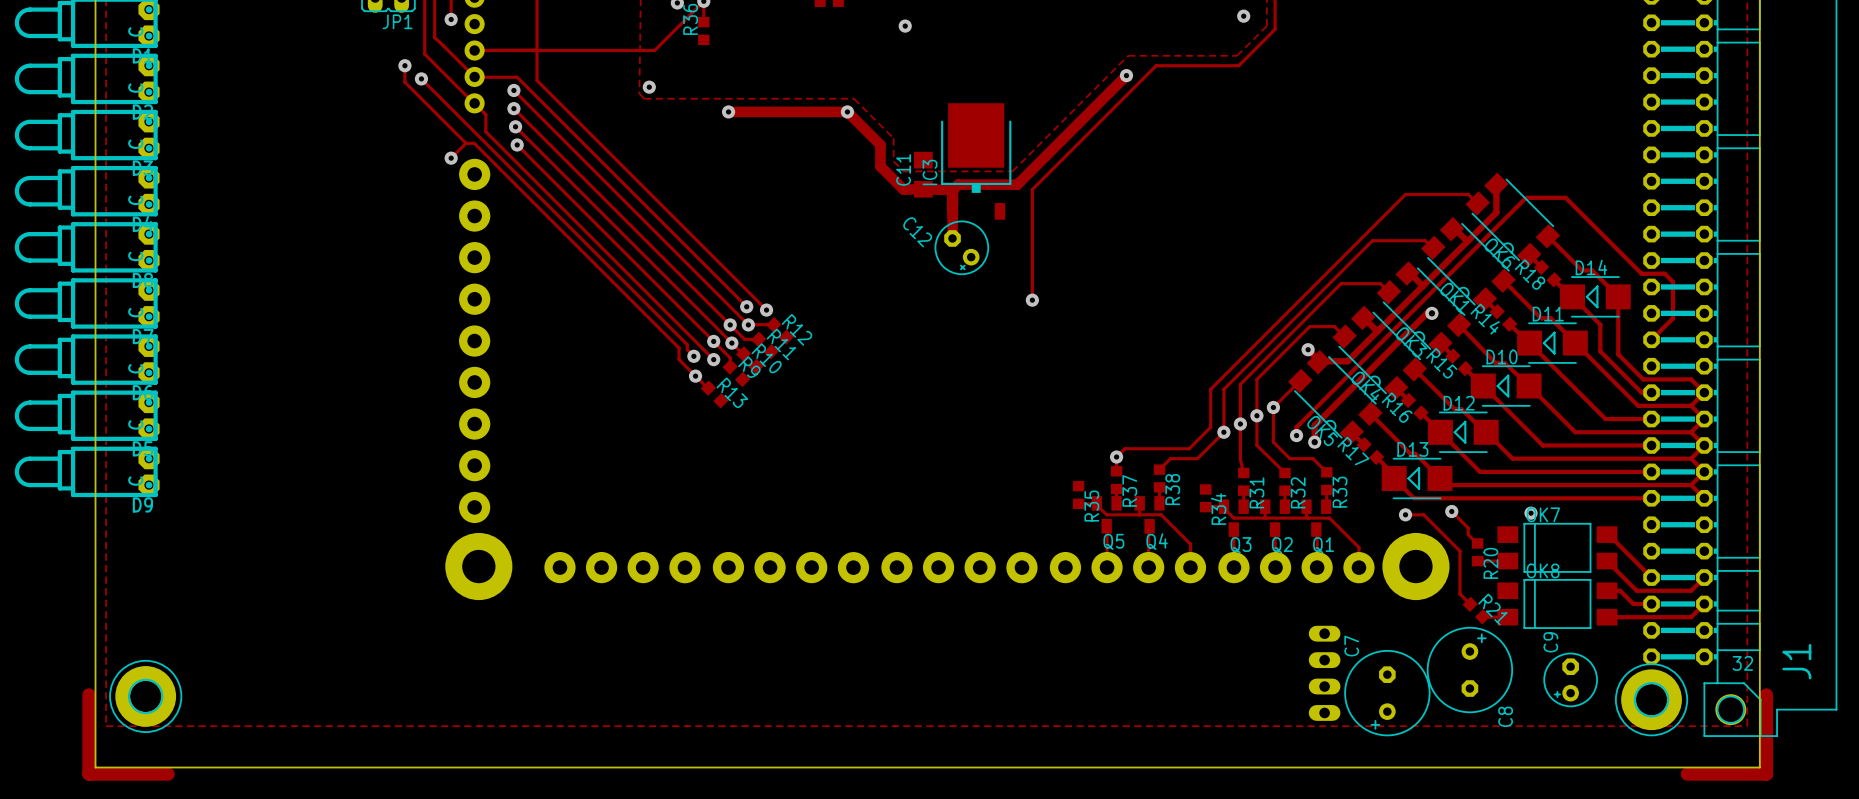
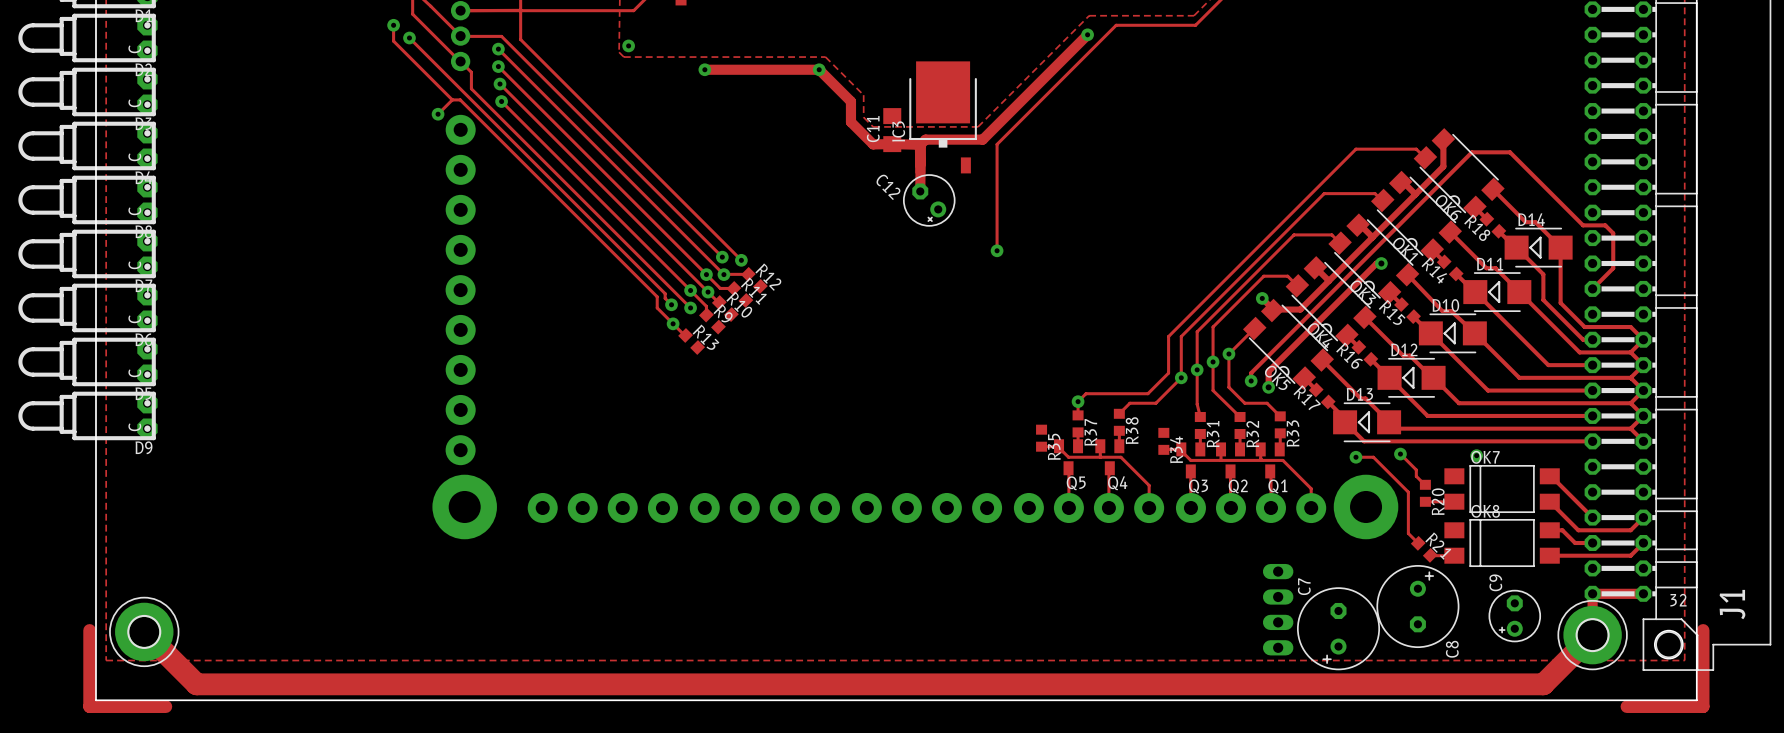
track: none -> (1643, 593) (1592, 593) (1592, 635) (1543, 684) (196, 684) (144, 631)

